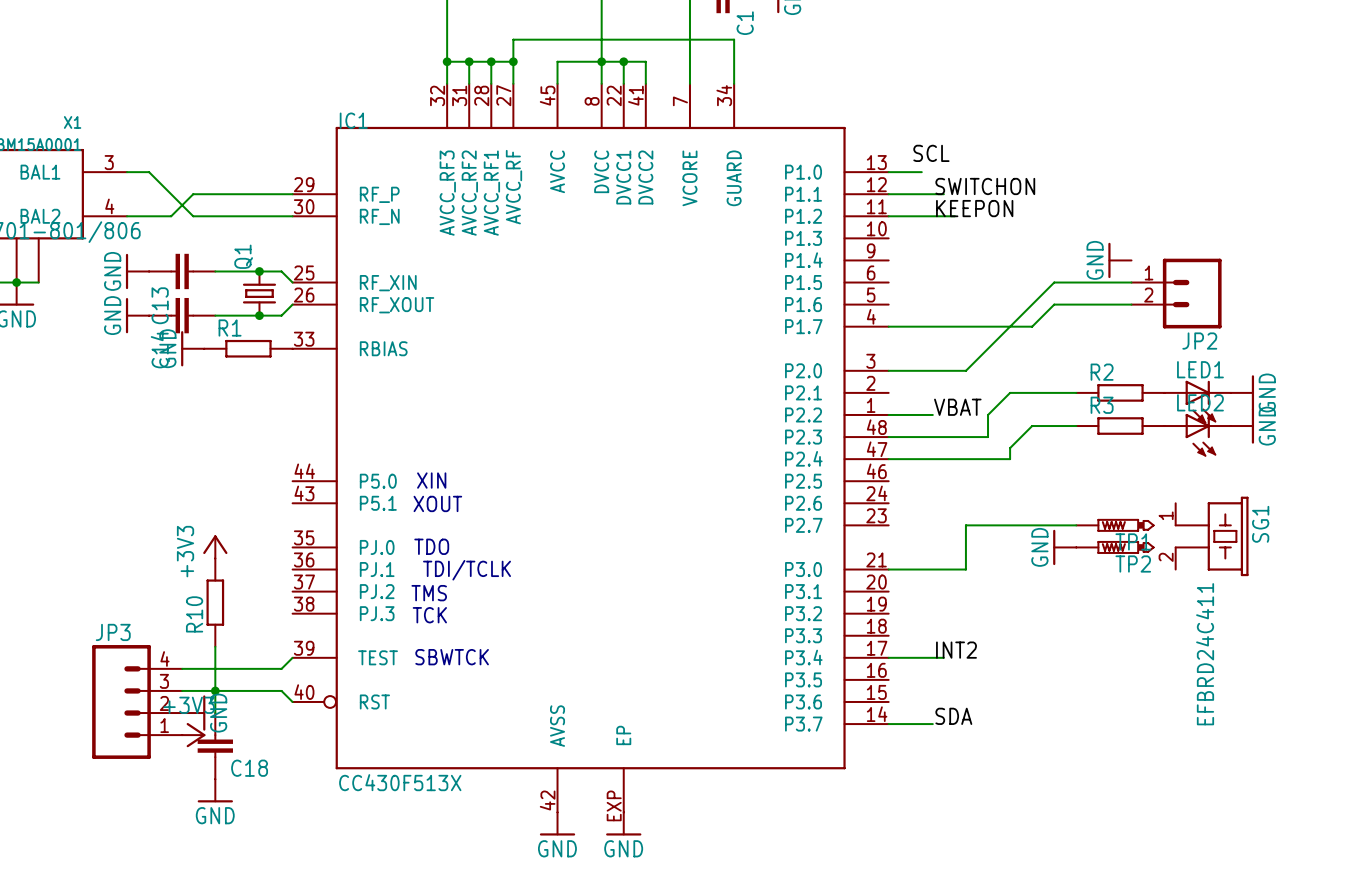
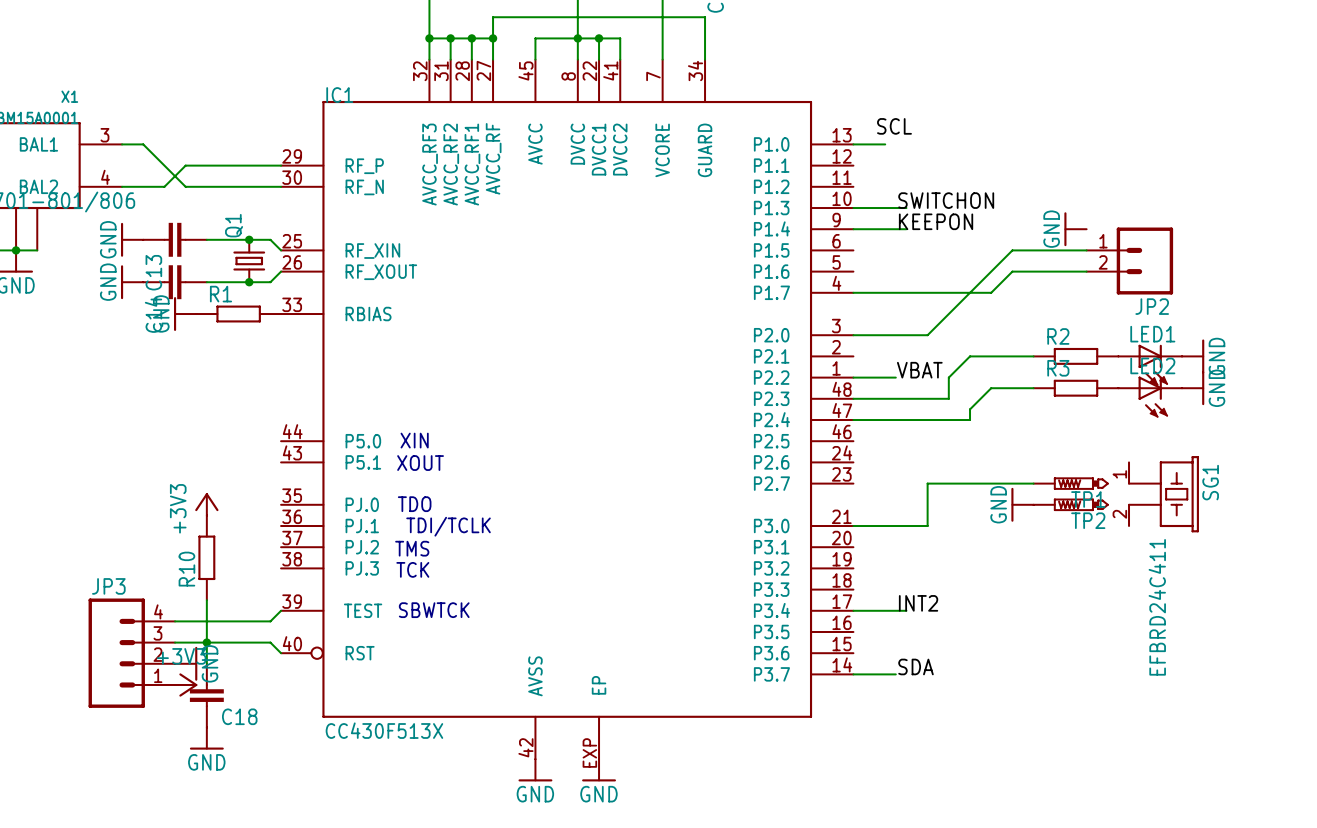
label position: SWITCHON (985, 186) -> SWITCHON (946, 200)
wire: (888, 194) (943, 194) -> (853, 208) (906, 208)
label position: KEEPON (974, 208) -> KEEPON (936, 221)
wire: (888, 216) (954, 216) -> none
wire: none -> (853, 229) (906, 229)

